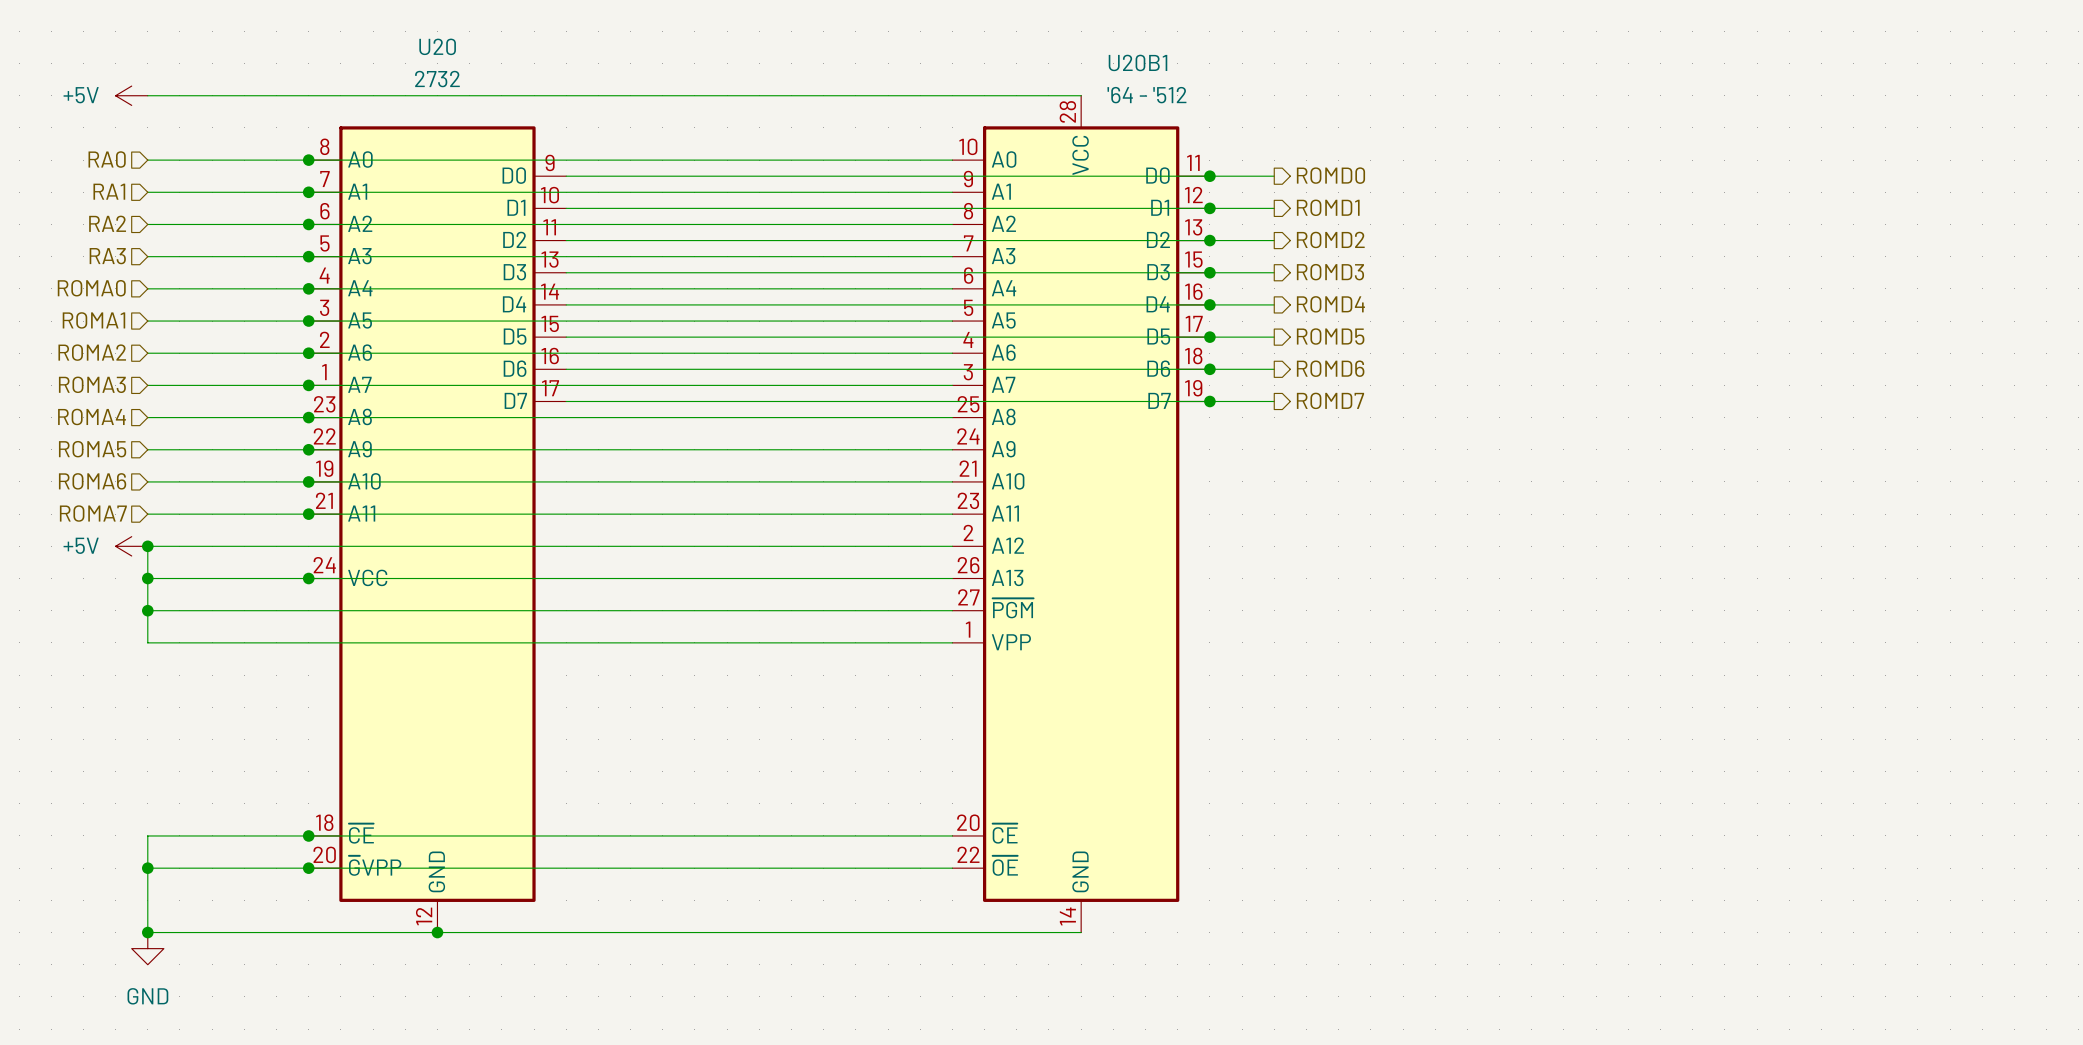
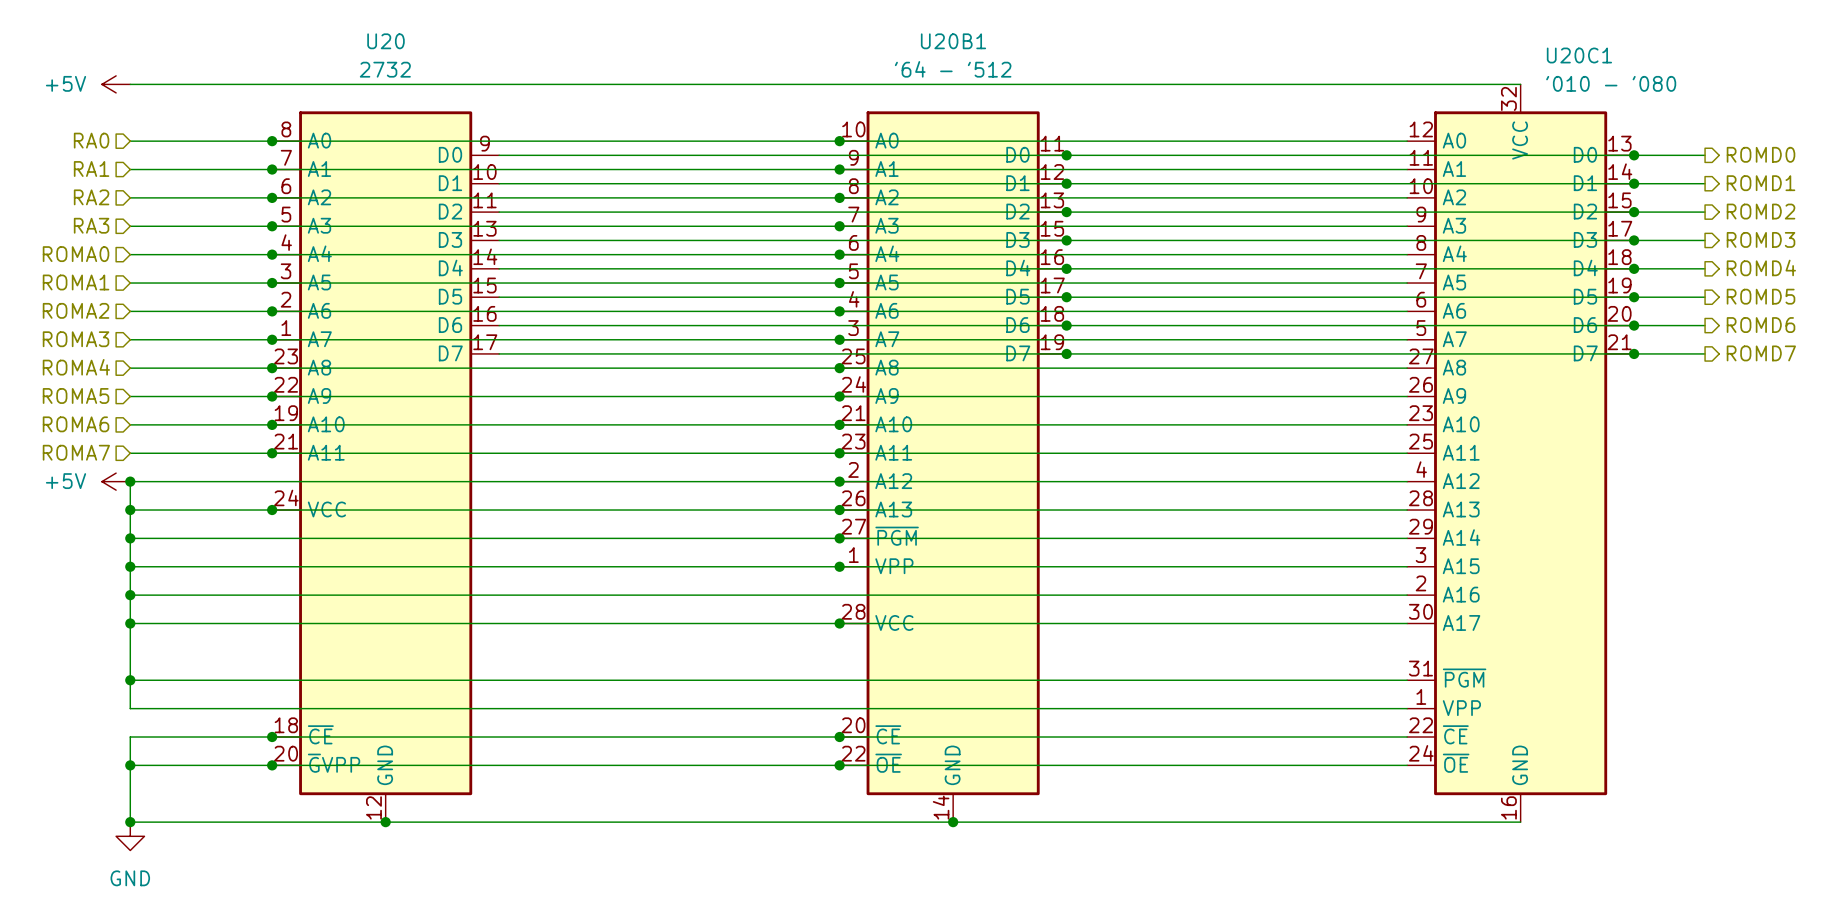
U20B1 name position: U20B1 (1137, 62) -> U20B1 (953, 41)
U20B1 symbol: [952, 95, 1210, 933] -> [839, 111, 1067, 823]
wire: none -> (953, 84) (1520, 84)
U20B1 value position: '64 - '512 (1146, 95) -> '64 - '512 (953, 69)
wire: none -> (839, 141) (1407, 141)
junction: none -> (839, 141)
hierarchical label: ROMD0 (1330, 175) -> none
hierarchical label: none -> ROMD0 (1761, 154)
wire: none -> (1123, 155) (1705, 155)
junction: none -> (1634, 155)
wire: none -> (839, 169) (1407, 169)
junction: none -> (839, 169)
hierarchical label: ROMD1 (1328, 207) -> none
hierarchical label: none -> ROMD1 (1761, 183)
wire: none -> (1123, 183) (1705, 183)
junction: none -> (1634, 183)
wire: none -> (839, 197) (1407, 197)
junction: none -> (839, 197)
hierarchical label: ROMD2 (1330, 239) -> none
hierarchical label: none -> ROMD2 (1761, 211)
wire: none -> (1123, 212) (1705, 212)
junction: none -> (1634, 212)
wire: none -> (839, 226) (1407, 226)
junction: none -> (839, 226)
wire: none -> (1123, 240) (1705, 240)
hierarchical label: ROMD3 (1330, 272) -> none
junction: none -> (1634, 240)
hierarchical label: none -> ROMD3 (1761, 239)
wire: none -> (839, 254) (1407, 254)
junction: none -> (839, 254)
wire: none -> (1123, 268) (1705, 268)
hierarchical label: ROMD4 (1330, 304) -> none
junction: none -> (1634, 268)
hierarchical label: none -> ROMD4 (1761, 267)
wire: none -> (839, 283) (1407, 283)
junction: none -> (839, 283)
hierarchical label: ROMD5 (1330, 336) -> none
hierarchical label: none -> ROMD5 (1761, 296)
wire: none -> (1123, 297) (1705, 297)
junction: none -> (1634, 297)
wire: none -> (839, 311) (1407, 311)
junction: none -> (839, 311)
hierarchical label: ROMD6 (1330, 368) -> none
hierarchical label: none -> ROMD6 (1761, 325)
wire: none -> (1123, 325) (1705, 325)
junction: none -> (1634, 325)
wire: none -> (839, 339) (1407, 339)
junction: none -> (839, 339)
hierarchical label: ROMD7 (1330, 400) -> none
hierarchical label: none -> ROMD7 (1761, 353)
wire: none -> (1123, 353) (1705, 353)
junction: none -> (1634, 353)
wire: none -> (839, 368) (1407, 368)
junction: none -> (839, 368)
wire: none -> (839, 396) (1407, 396)
junction: none -> (839, 396)
wire: none -> (839, 424) (1407, 424)
junction: none -> (839, 424)
wire: none -> (839, 453) (1407, 453)
junction: none -> (839, 453)
U20C1: none -> '010 - '080 (1520, 453)
wire: none -> (839, 481) (1407, 481)
junction: none -> (839, 481)
wire: none -> (839, 510) (1407, 510)
junction: none -> (839, 510)
wire: none -> (839, 538) (1407, 538)
junction: none -> (839, 538)
wire: none -> (130, 566) (130, 708) (1407, 708)
junction: none -> (130, 566)
wire: none -> (839, 566) (1407, 566)
junction: none -> (839, 566)
wire: none -> (130, 595) (1407, 595)
junction: none -> (130, 595)
wire: none -> (130, 623) (1407, 623)
junction: none -> (130, 623)
junction: none -> (839, 623)
wire: none -> (130, 680) (1407, 680)
junction: none -> (130, 680)
wire: none -> (839, 737) (1407, 737)
junction: none -> (839, 737)
wire: none -> (839, 765) (1407, 765)
junction: none -> (839, 765)
wire: none -> (953, 822) (1520, 822)
junction: none -> (953, 822)

